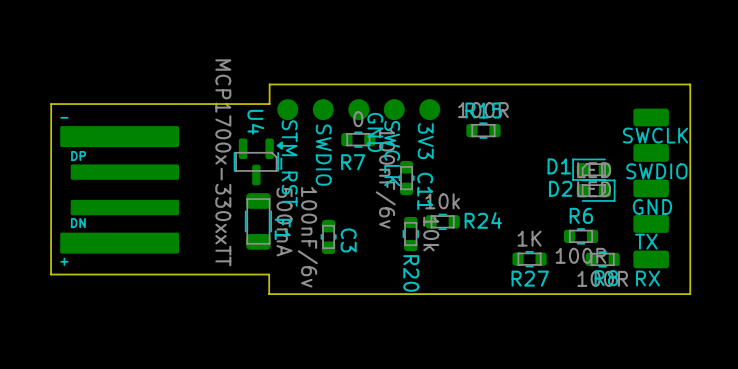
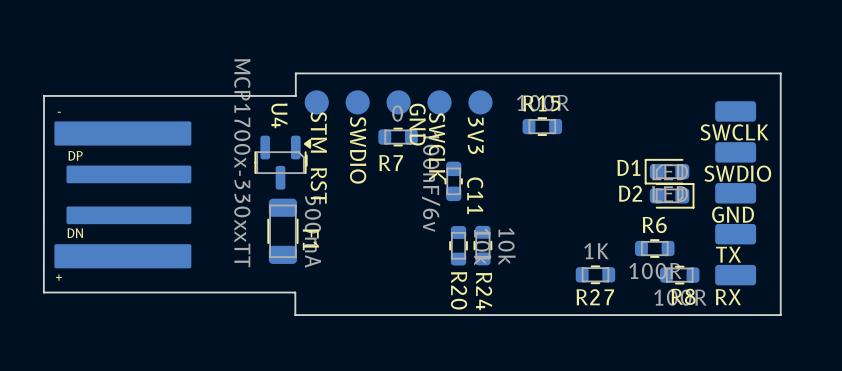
R24 rotation: 0° (442, 221) -> 90° clockwise (482, 245)
C3: 100nF/6v (328, 236) -> none

